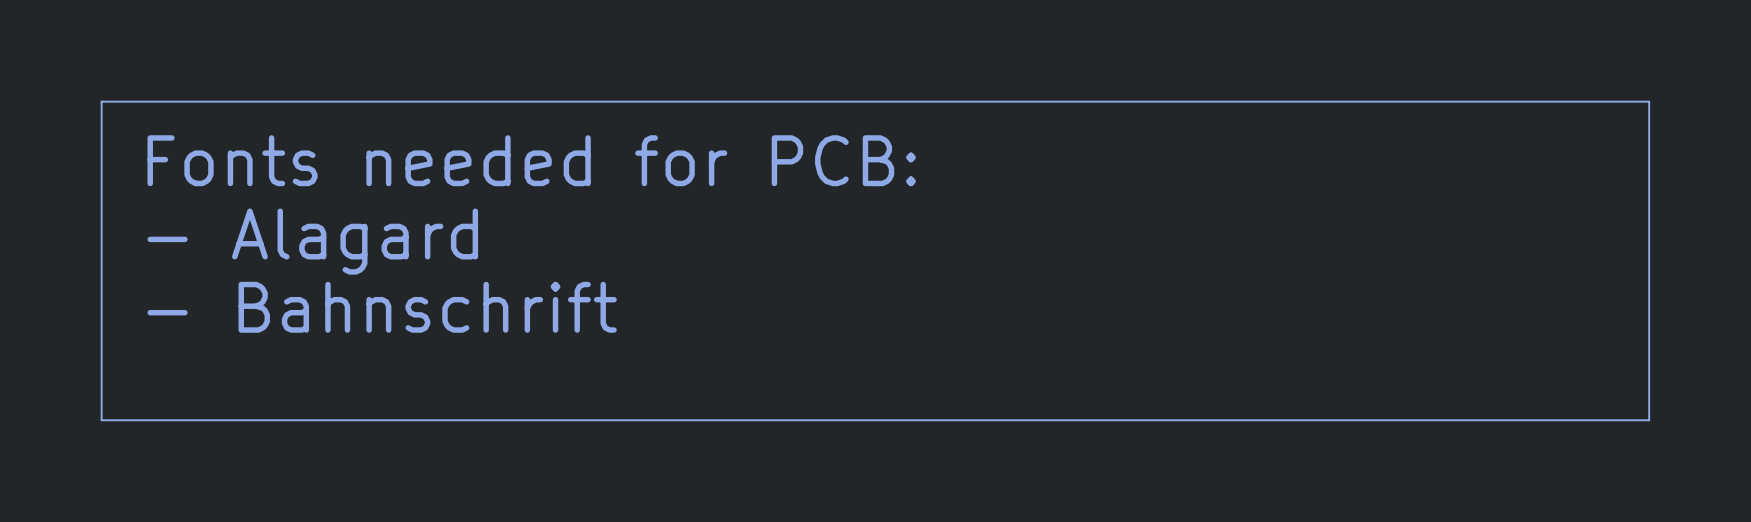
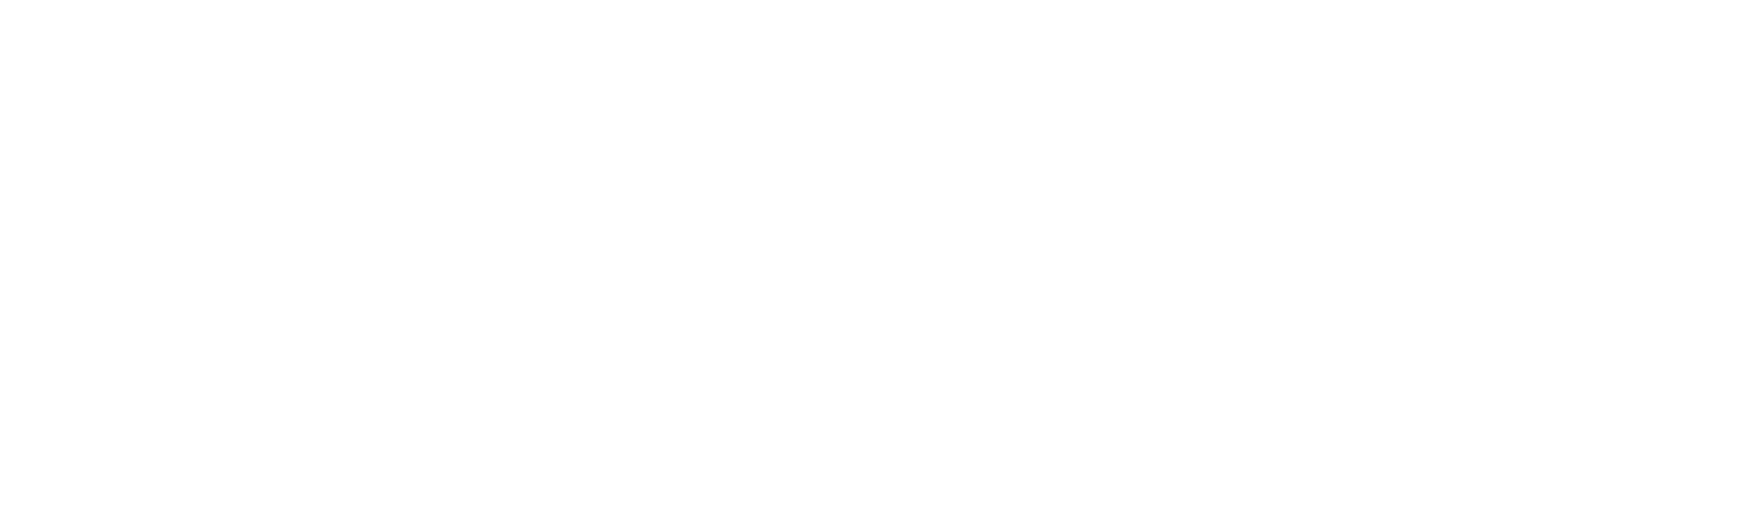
line: (101, 101) (1649, 101) (1649, 420) (101, 420) (101, 101) -> none
text: Fonts needed for PCB: (531, 160) -> none
text: - Alagard (312, 241) -> none
text: - Bahnschrift (382, 307) -> none

